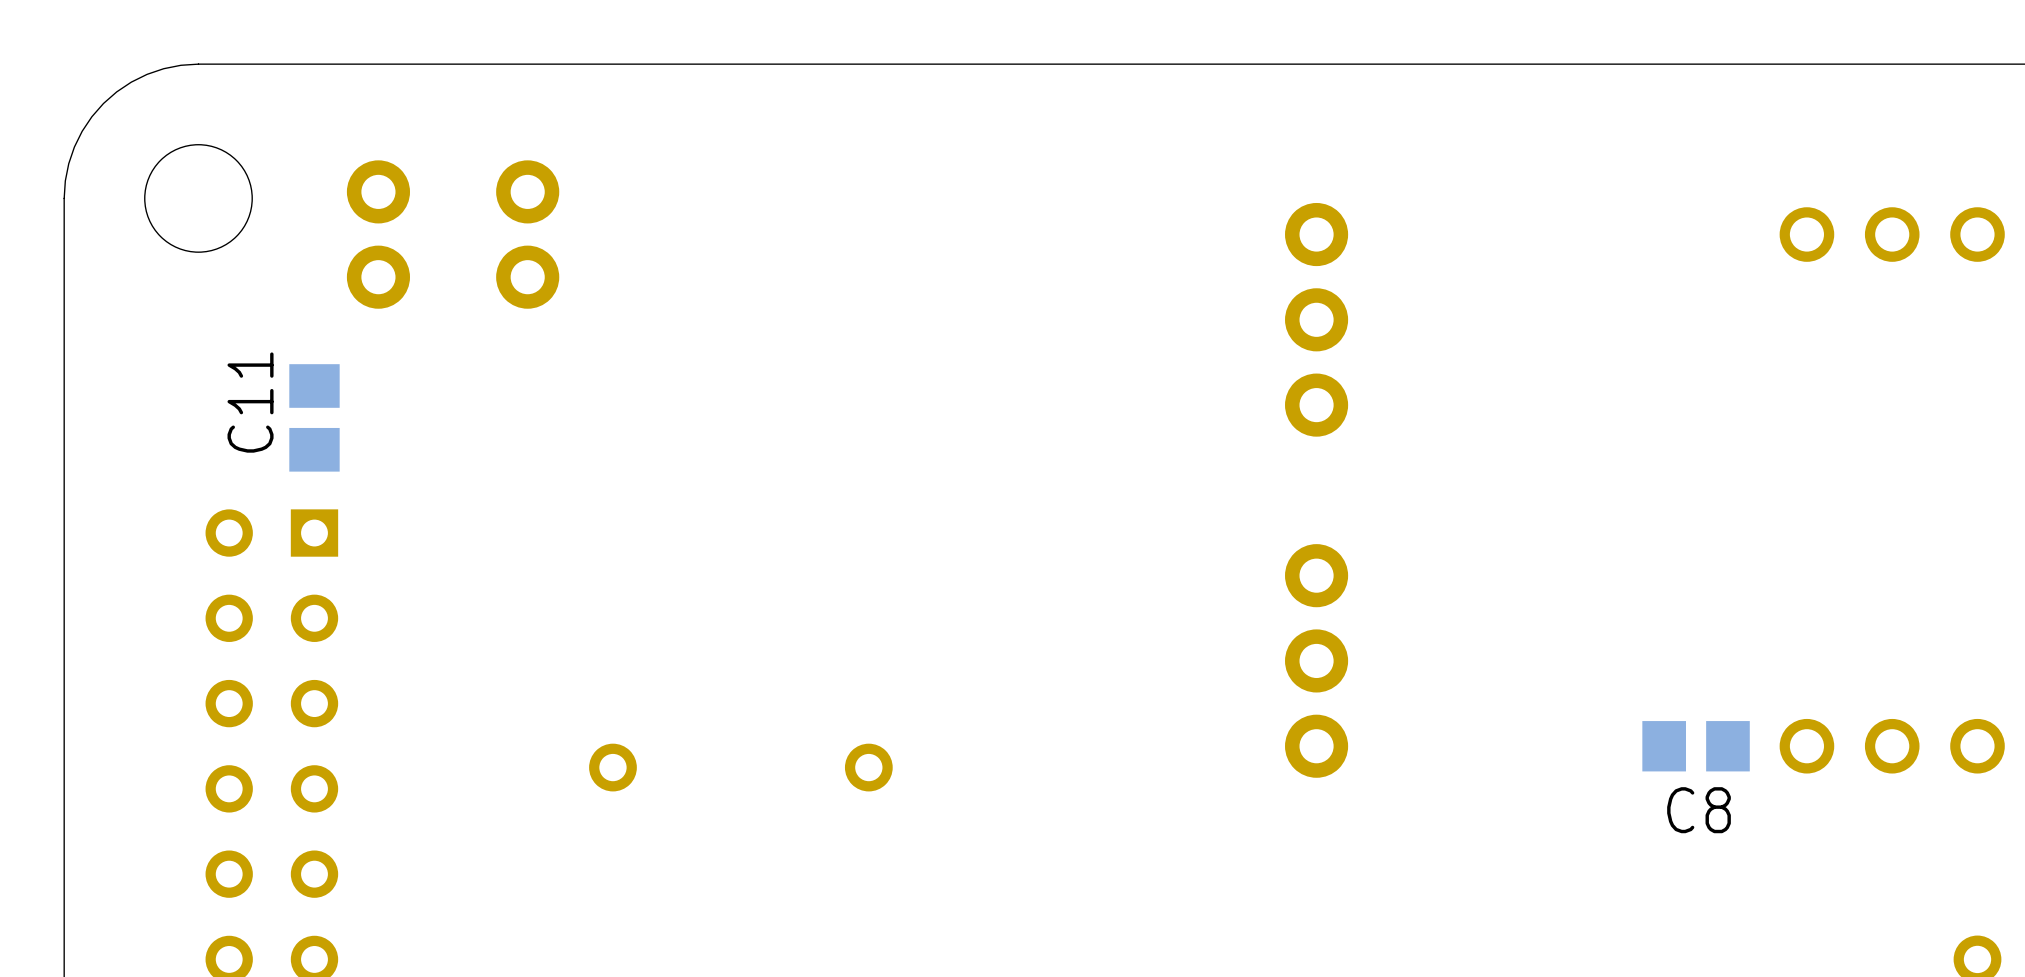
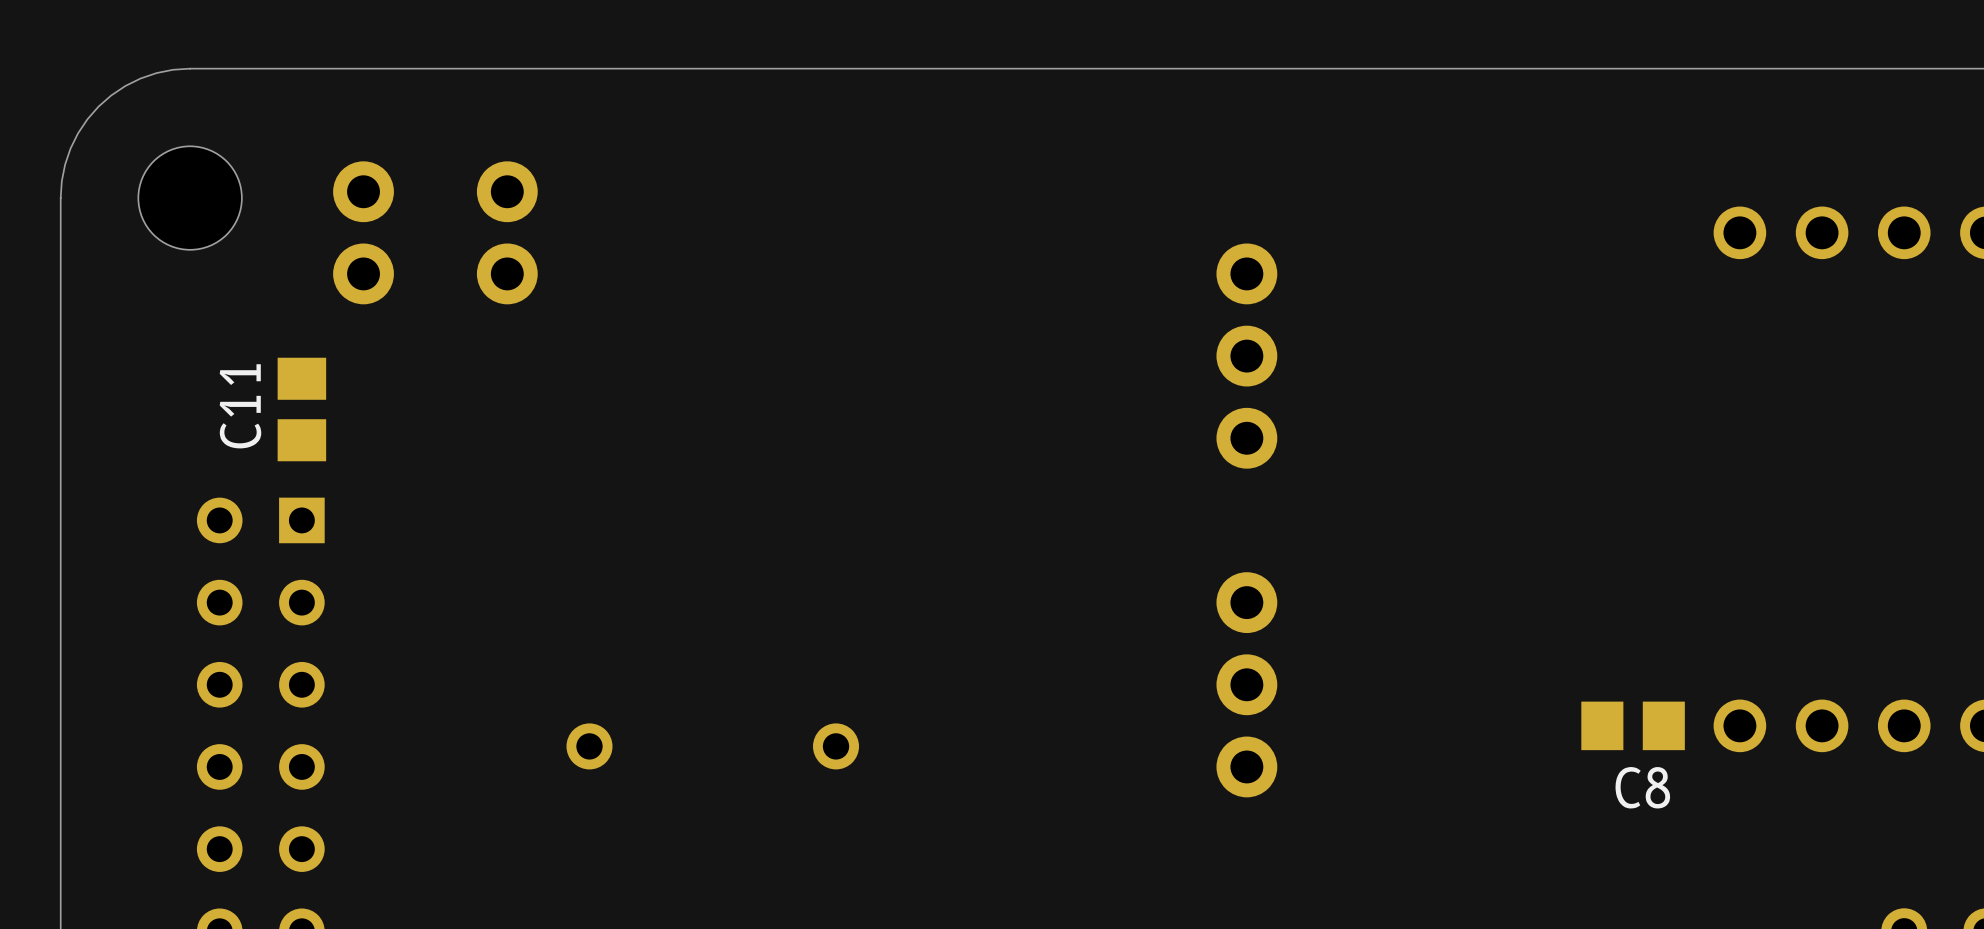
part position: (1316, 319) -> (1246, 356)
part position: (1316, 660) -> (1246, 684)

